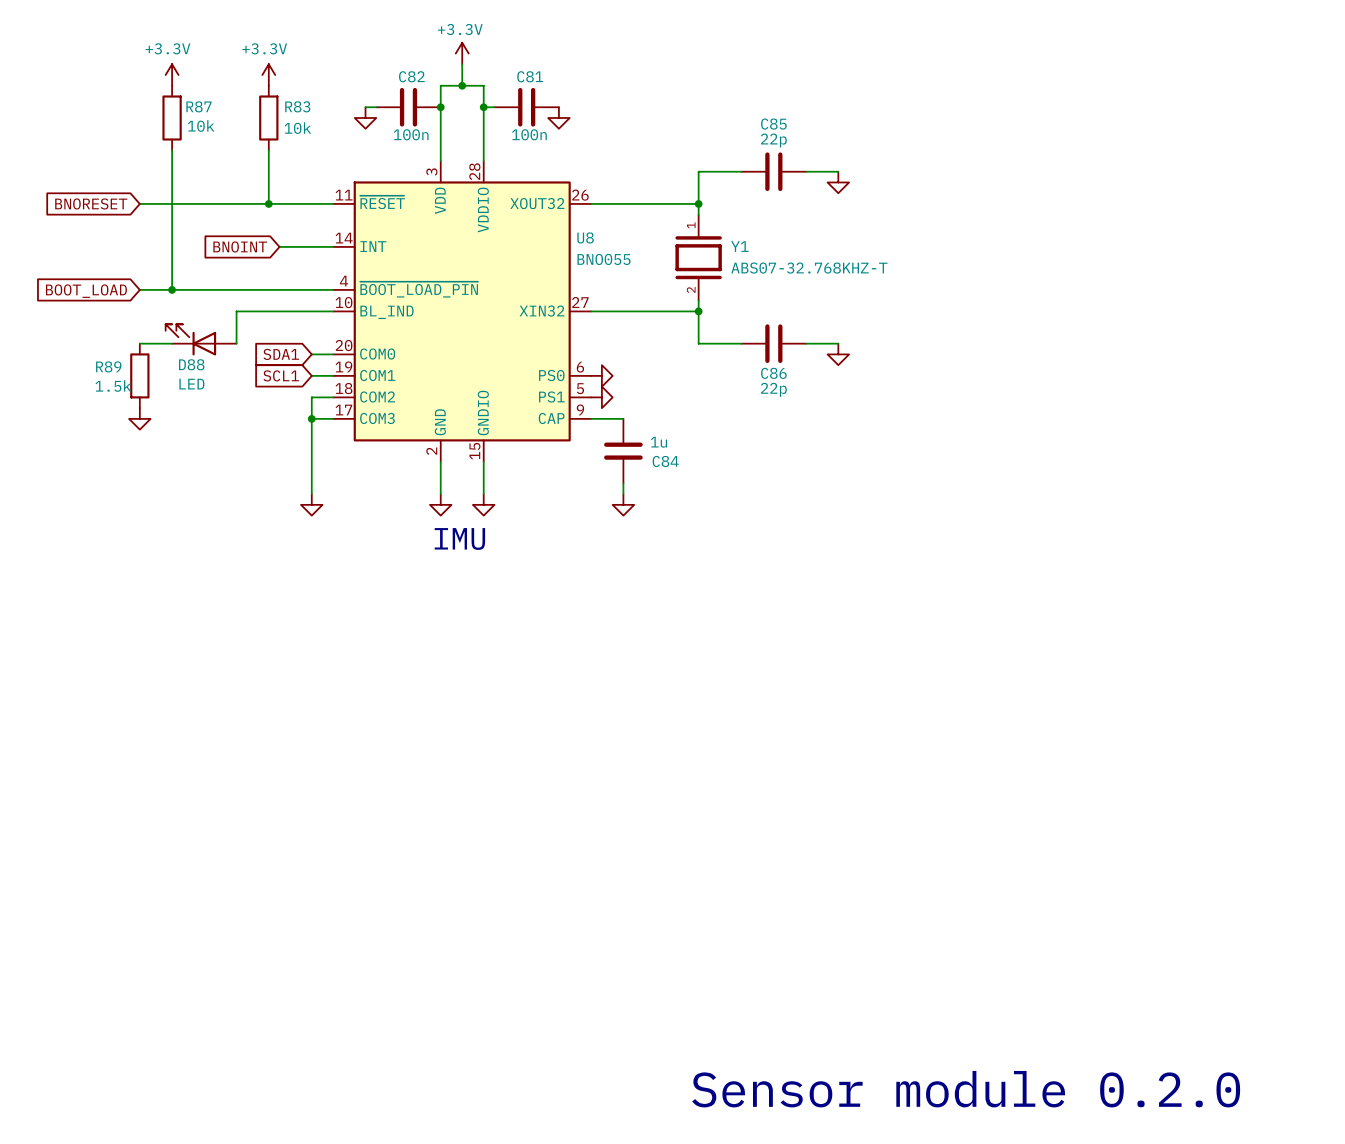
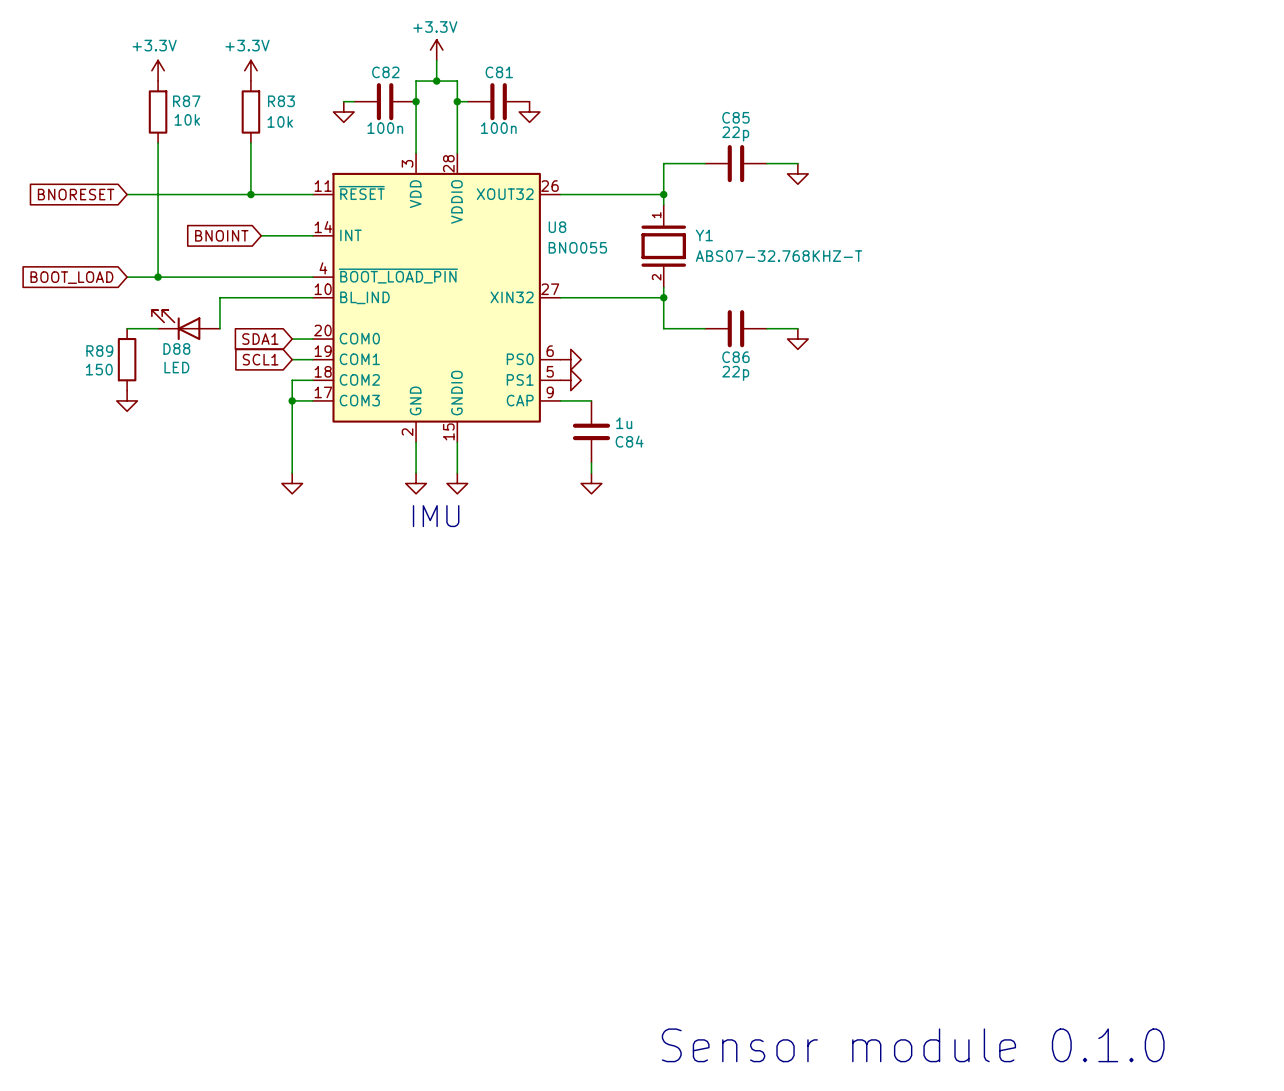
R89 value: 1.5k (113, 386) -> 150 (99, 369)
text: Sensor module 0.2.0 (966, 1089) -> Sensor module 0.1.0 (913, 1045)

